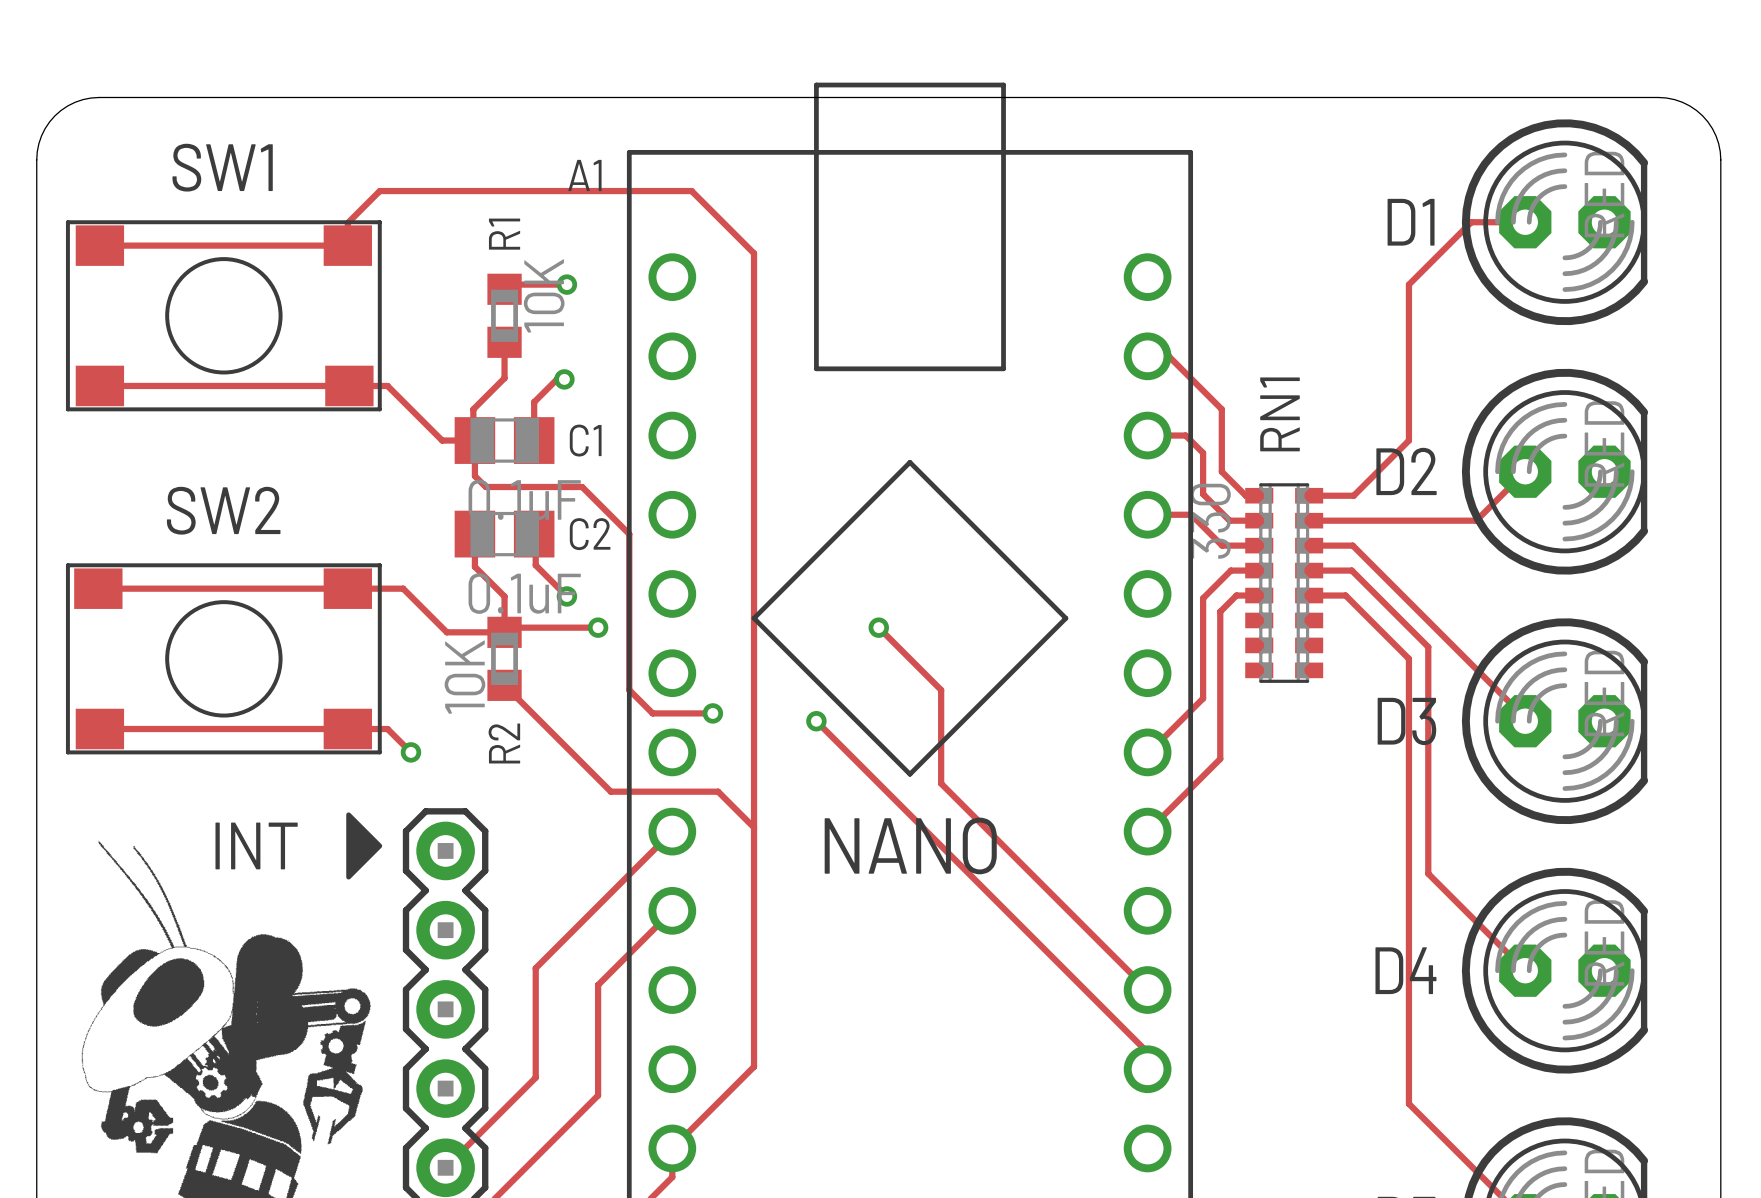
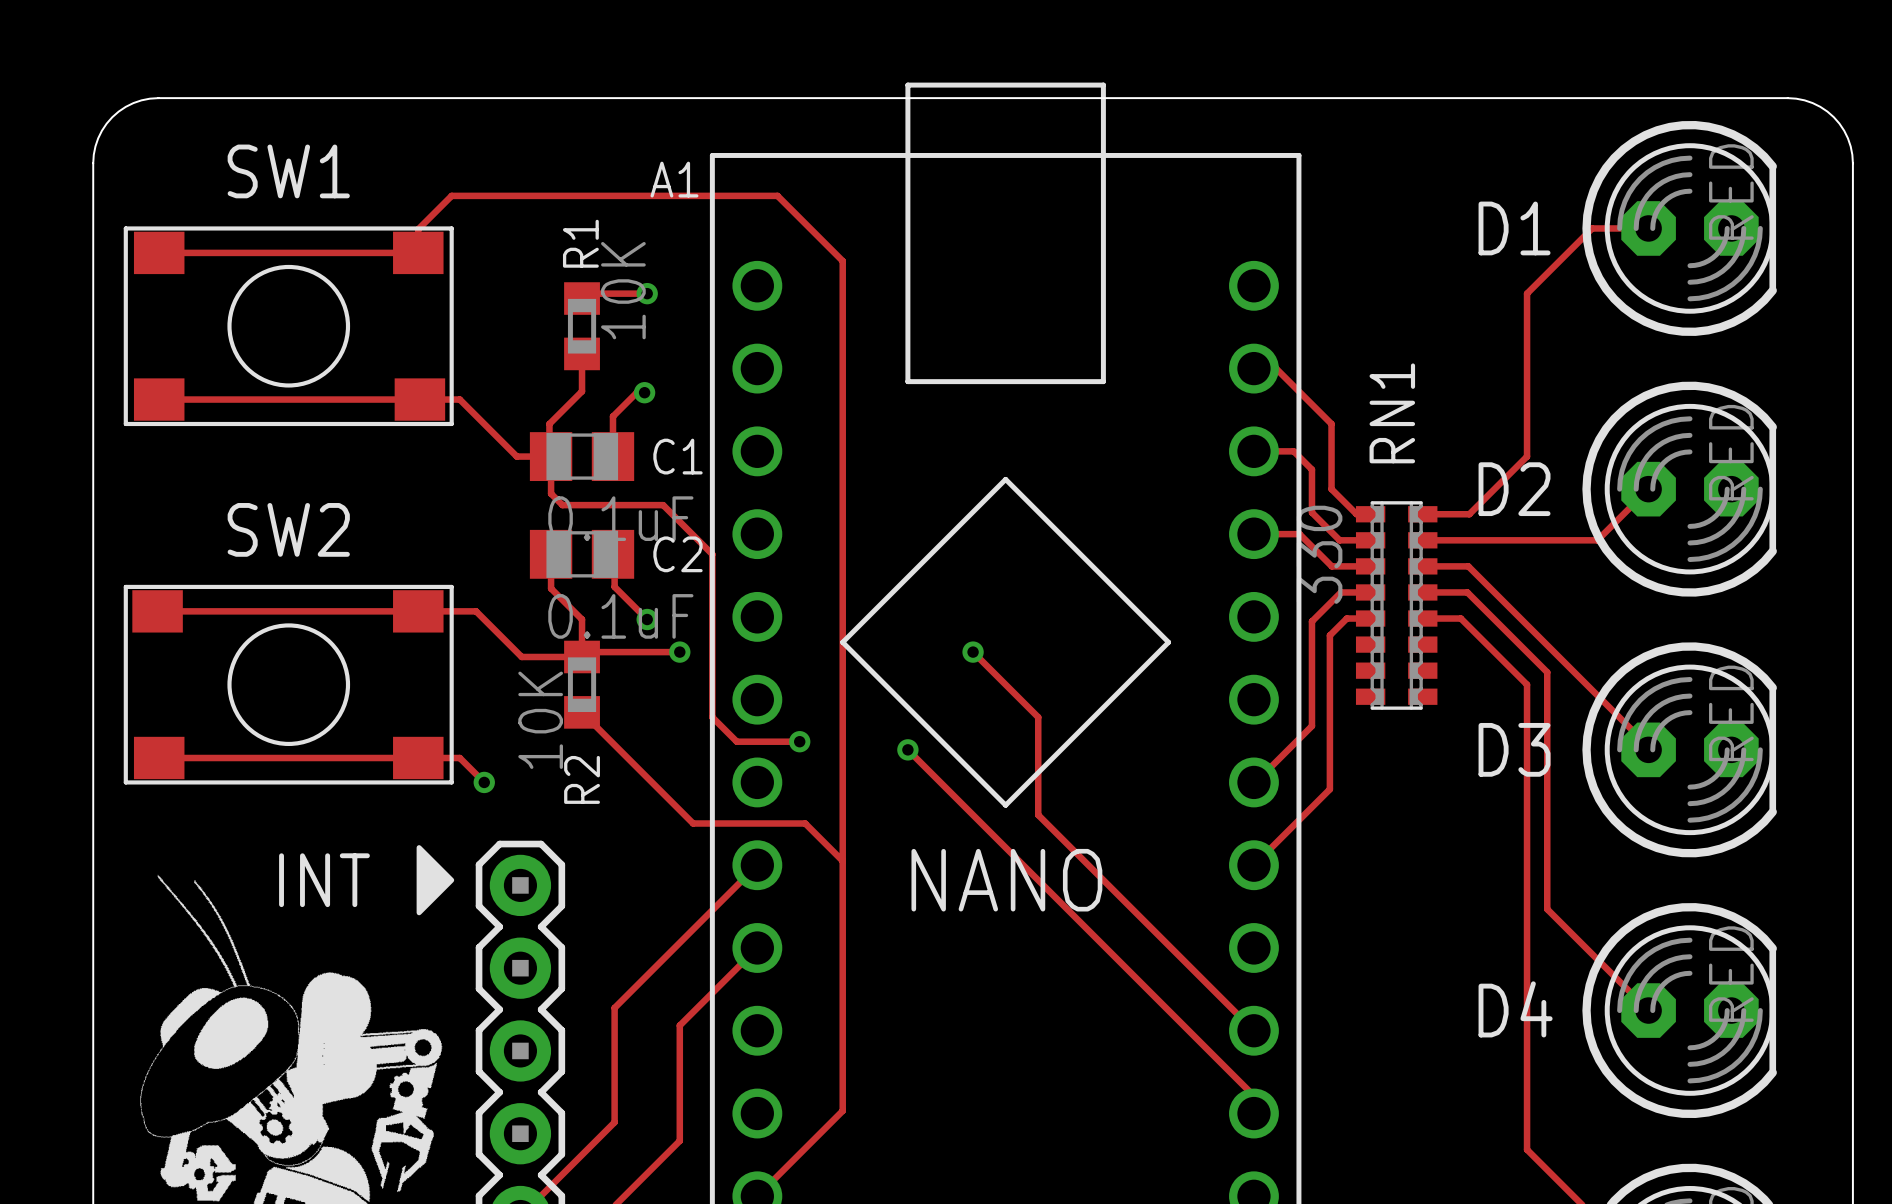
R1 name position: R1 (504, 234) -> R1 (580, 243)

